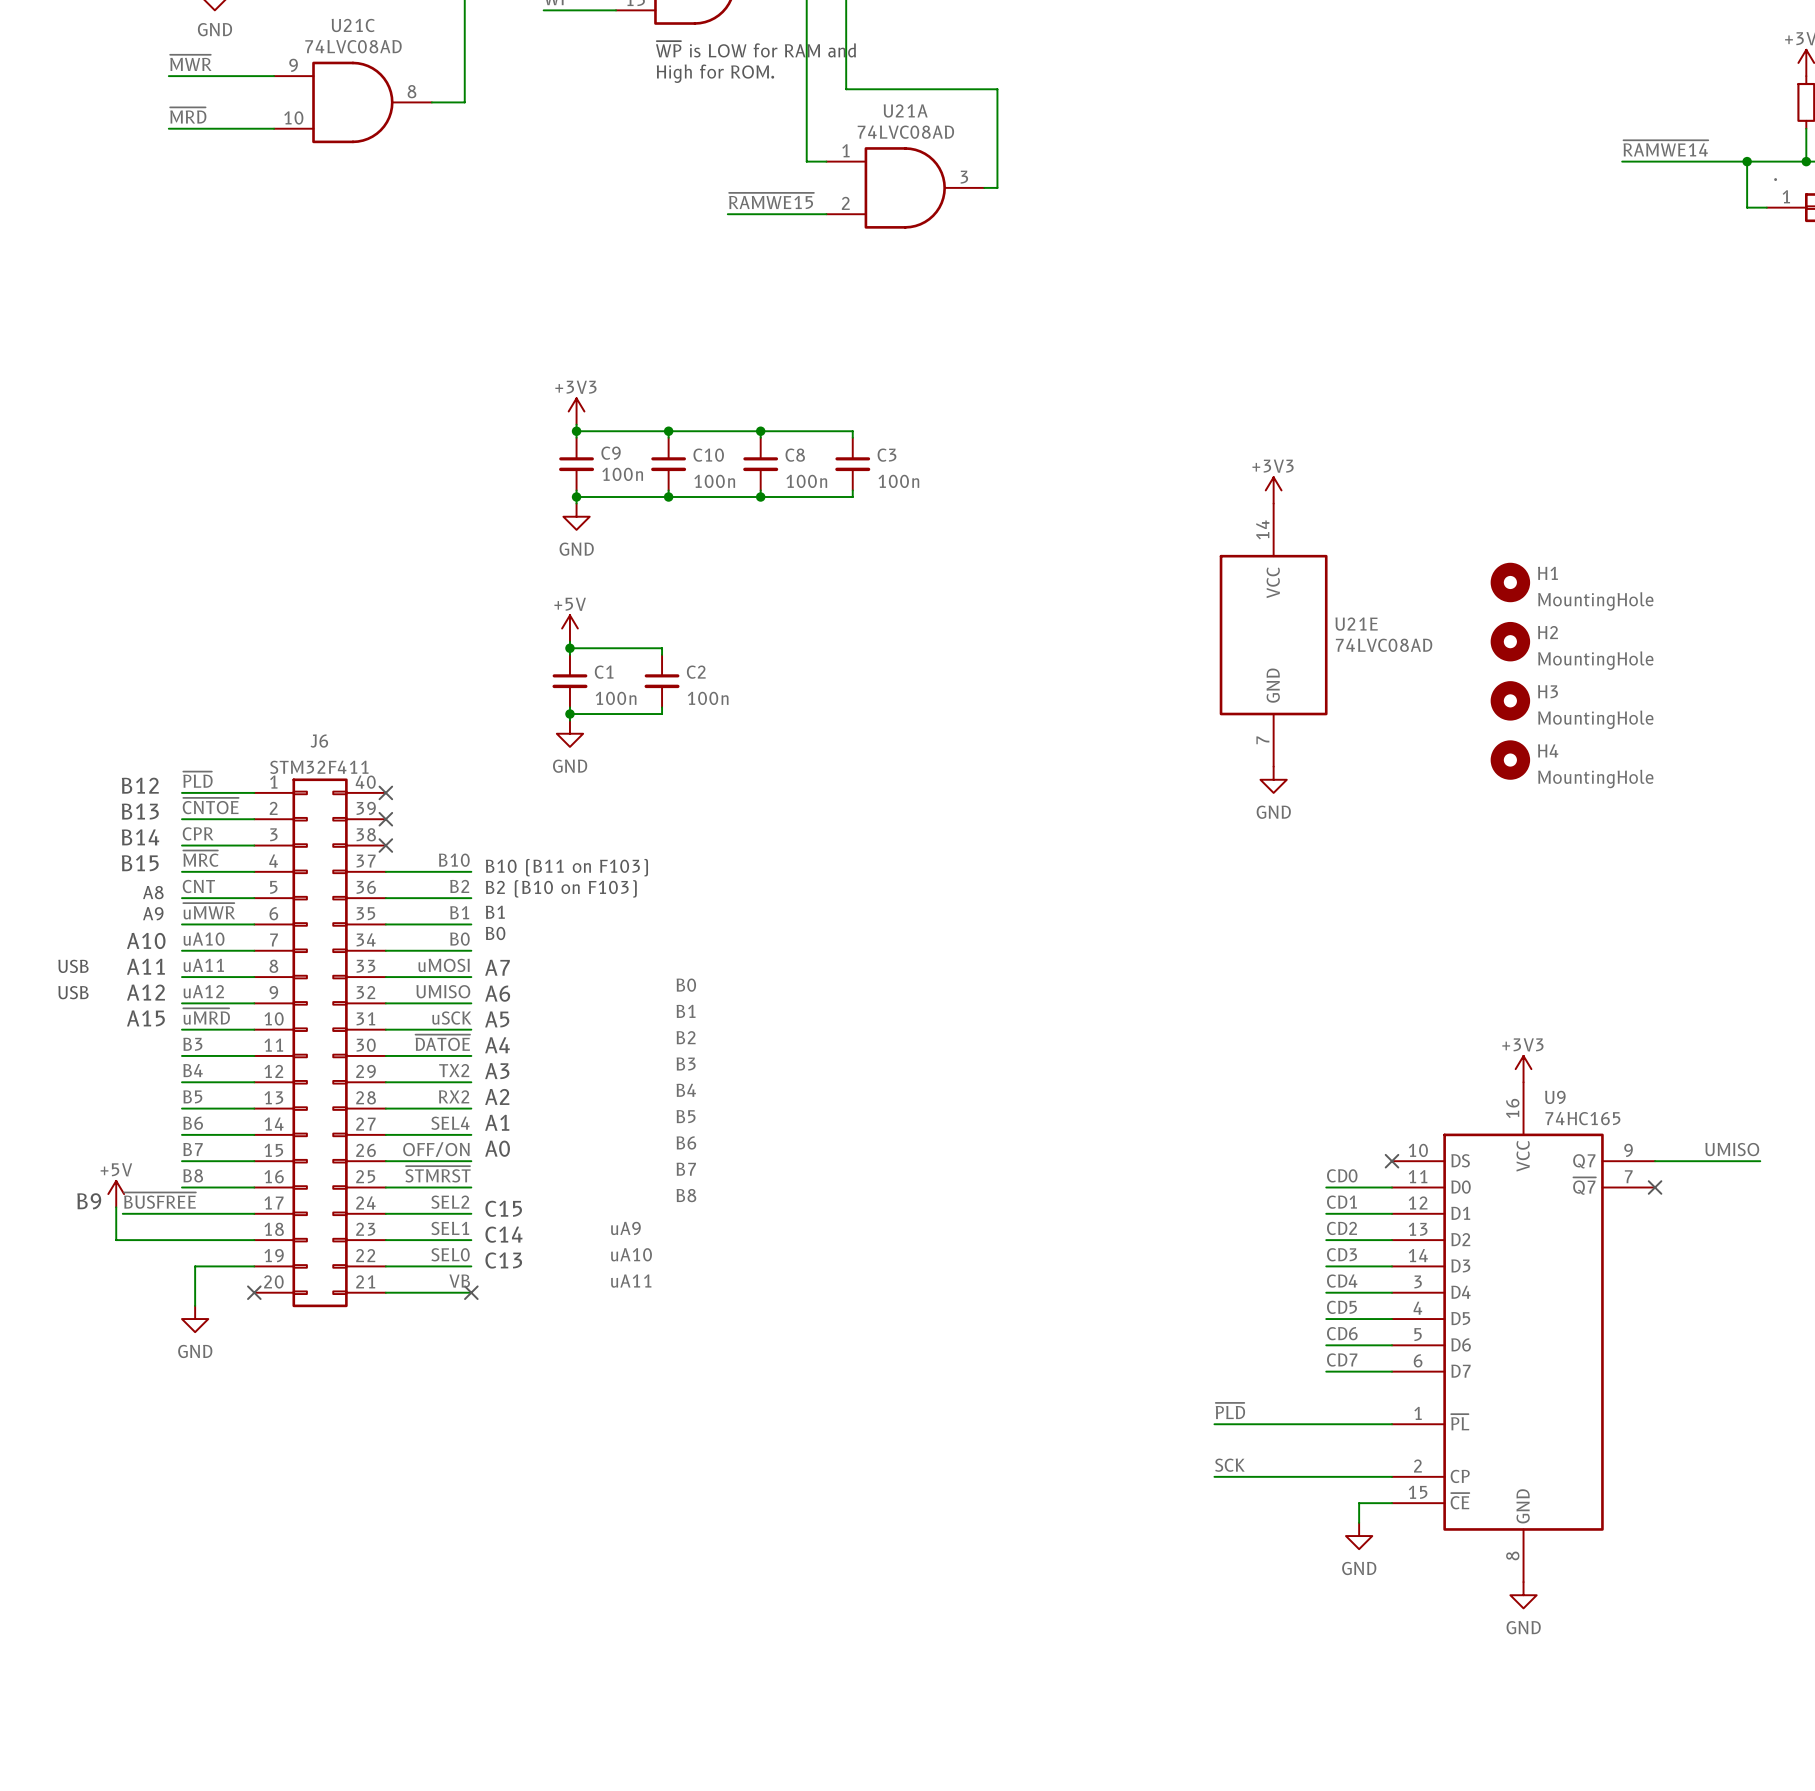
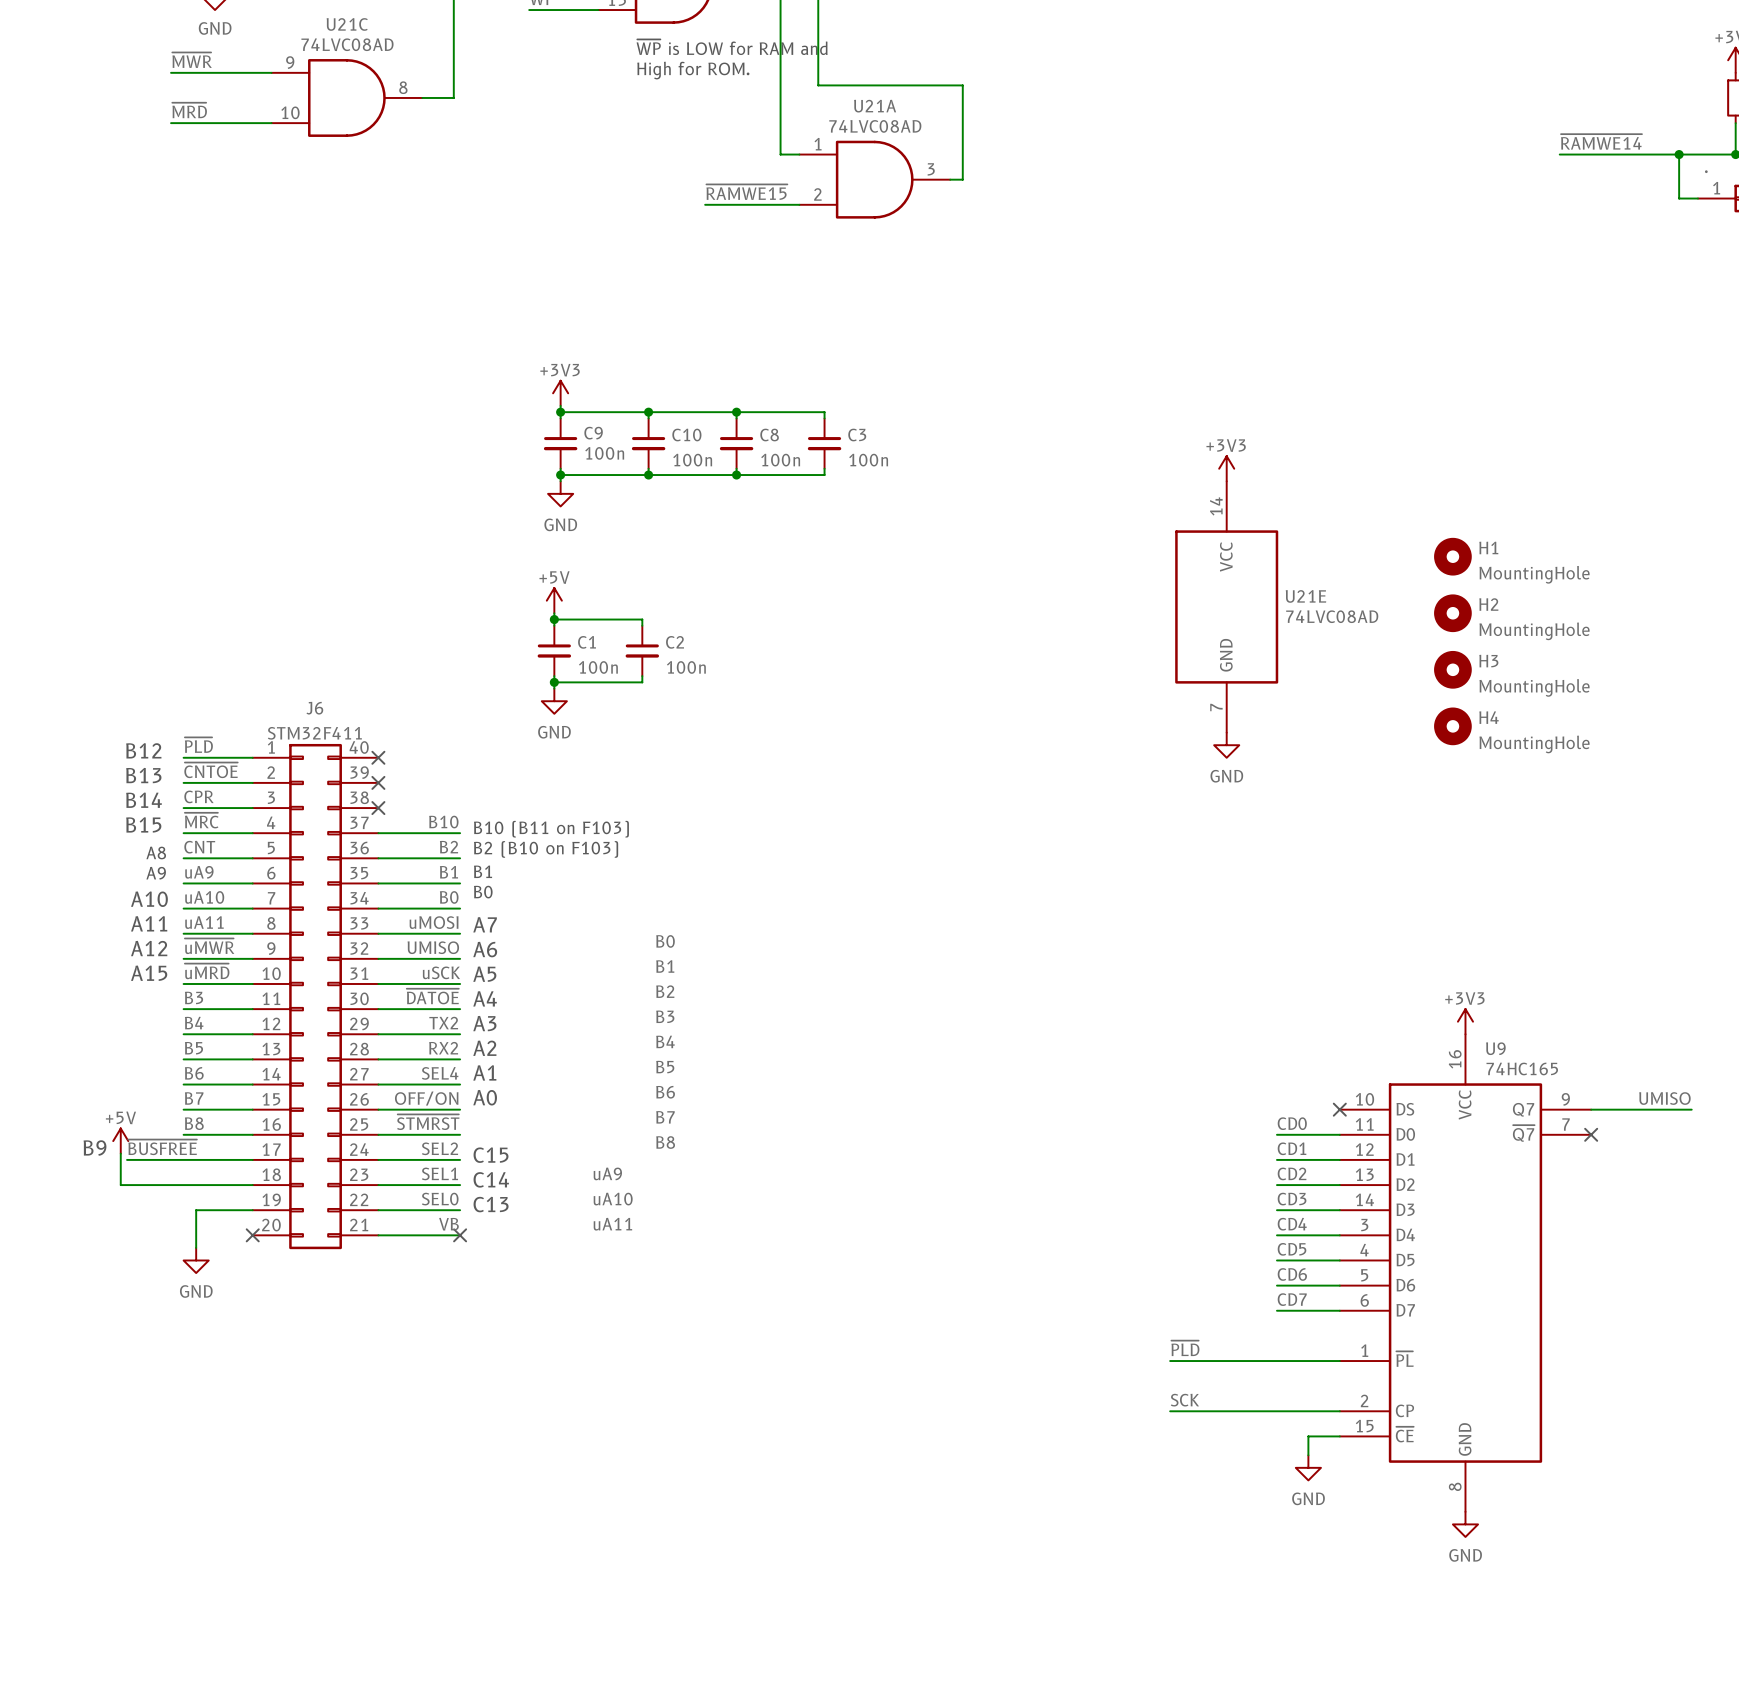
label: ~{uMWR} (209, 911) -> uA9 (199, 872)
text: USB (73, 966) -> none
label: uA12 (203, 991) -> ~{uMWR} (209, 946)
text: USB (73, 992) -> none

